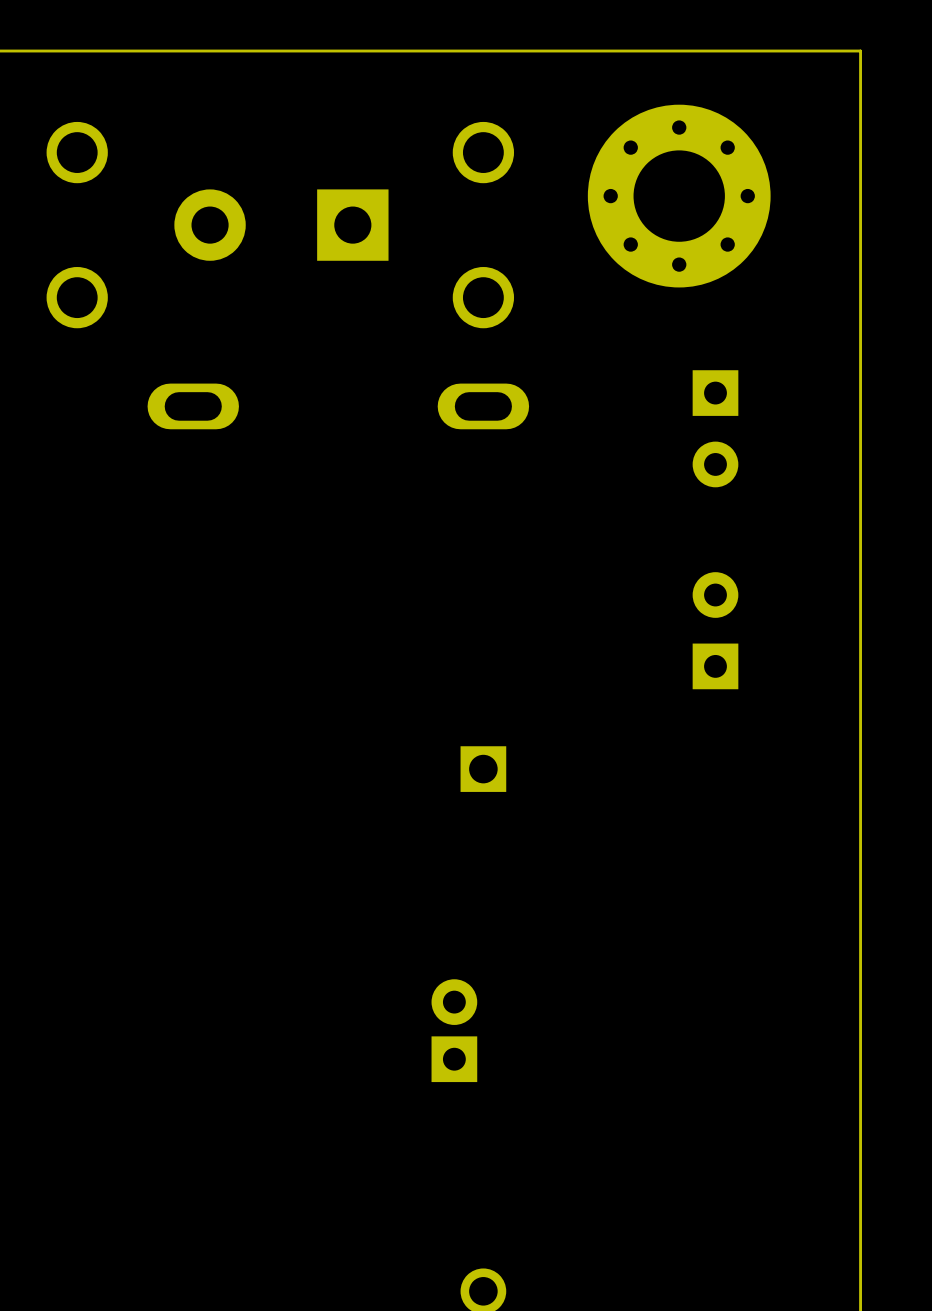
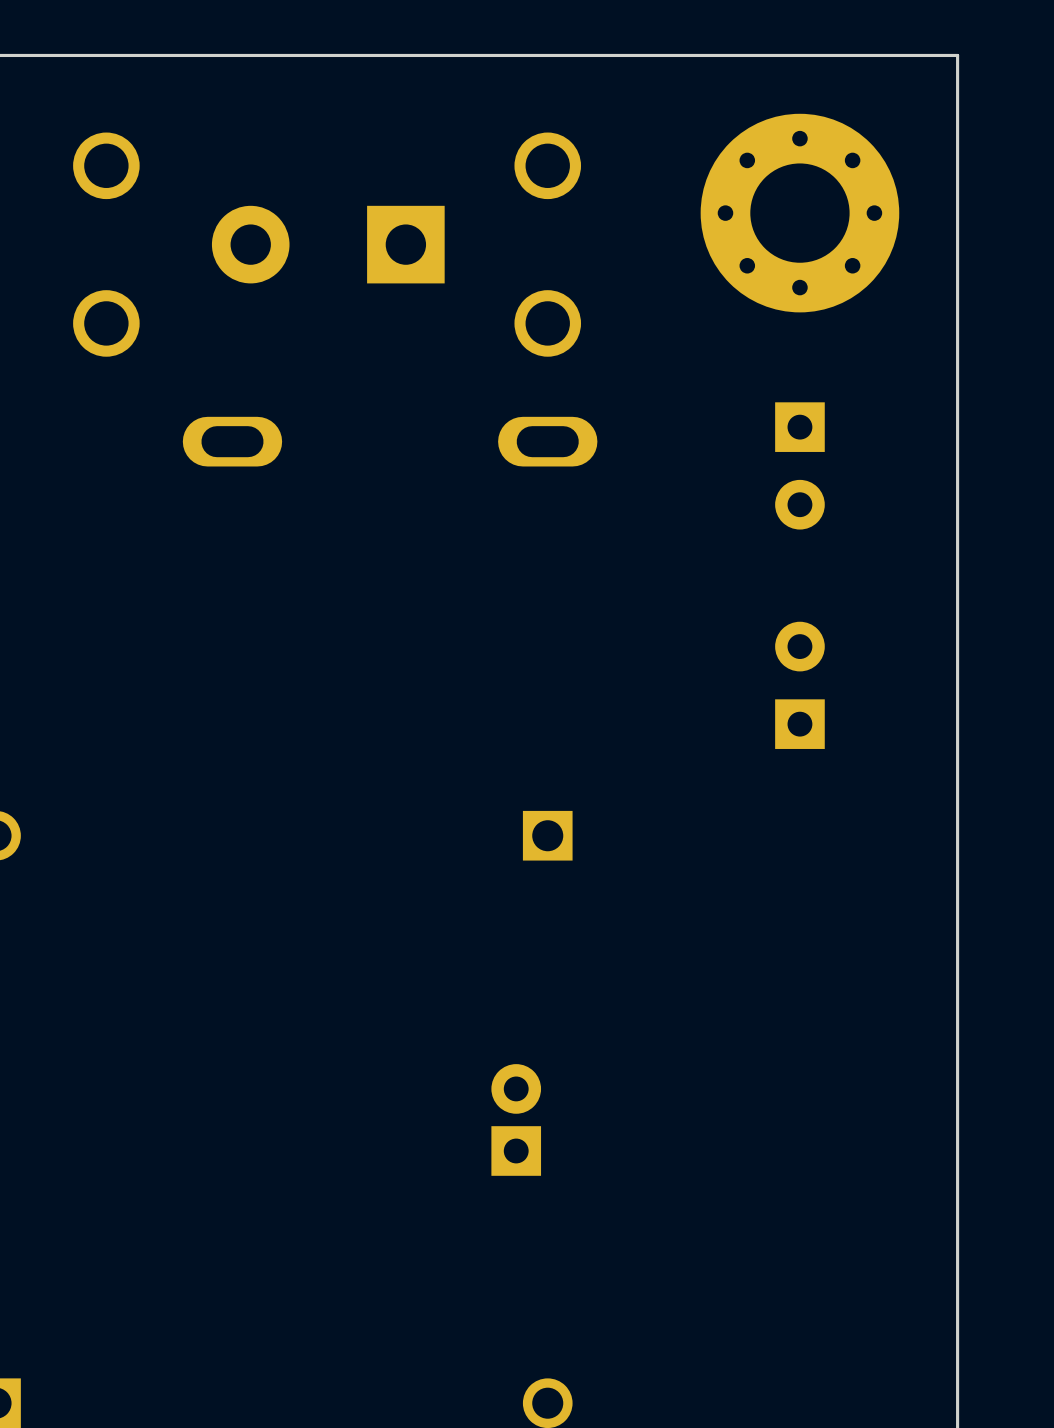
part position: (679, 196) -> (799, 213)

